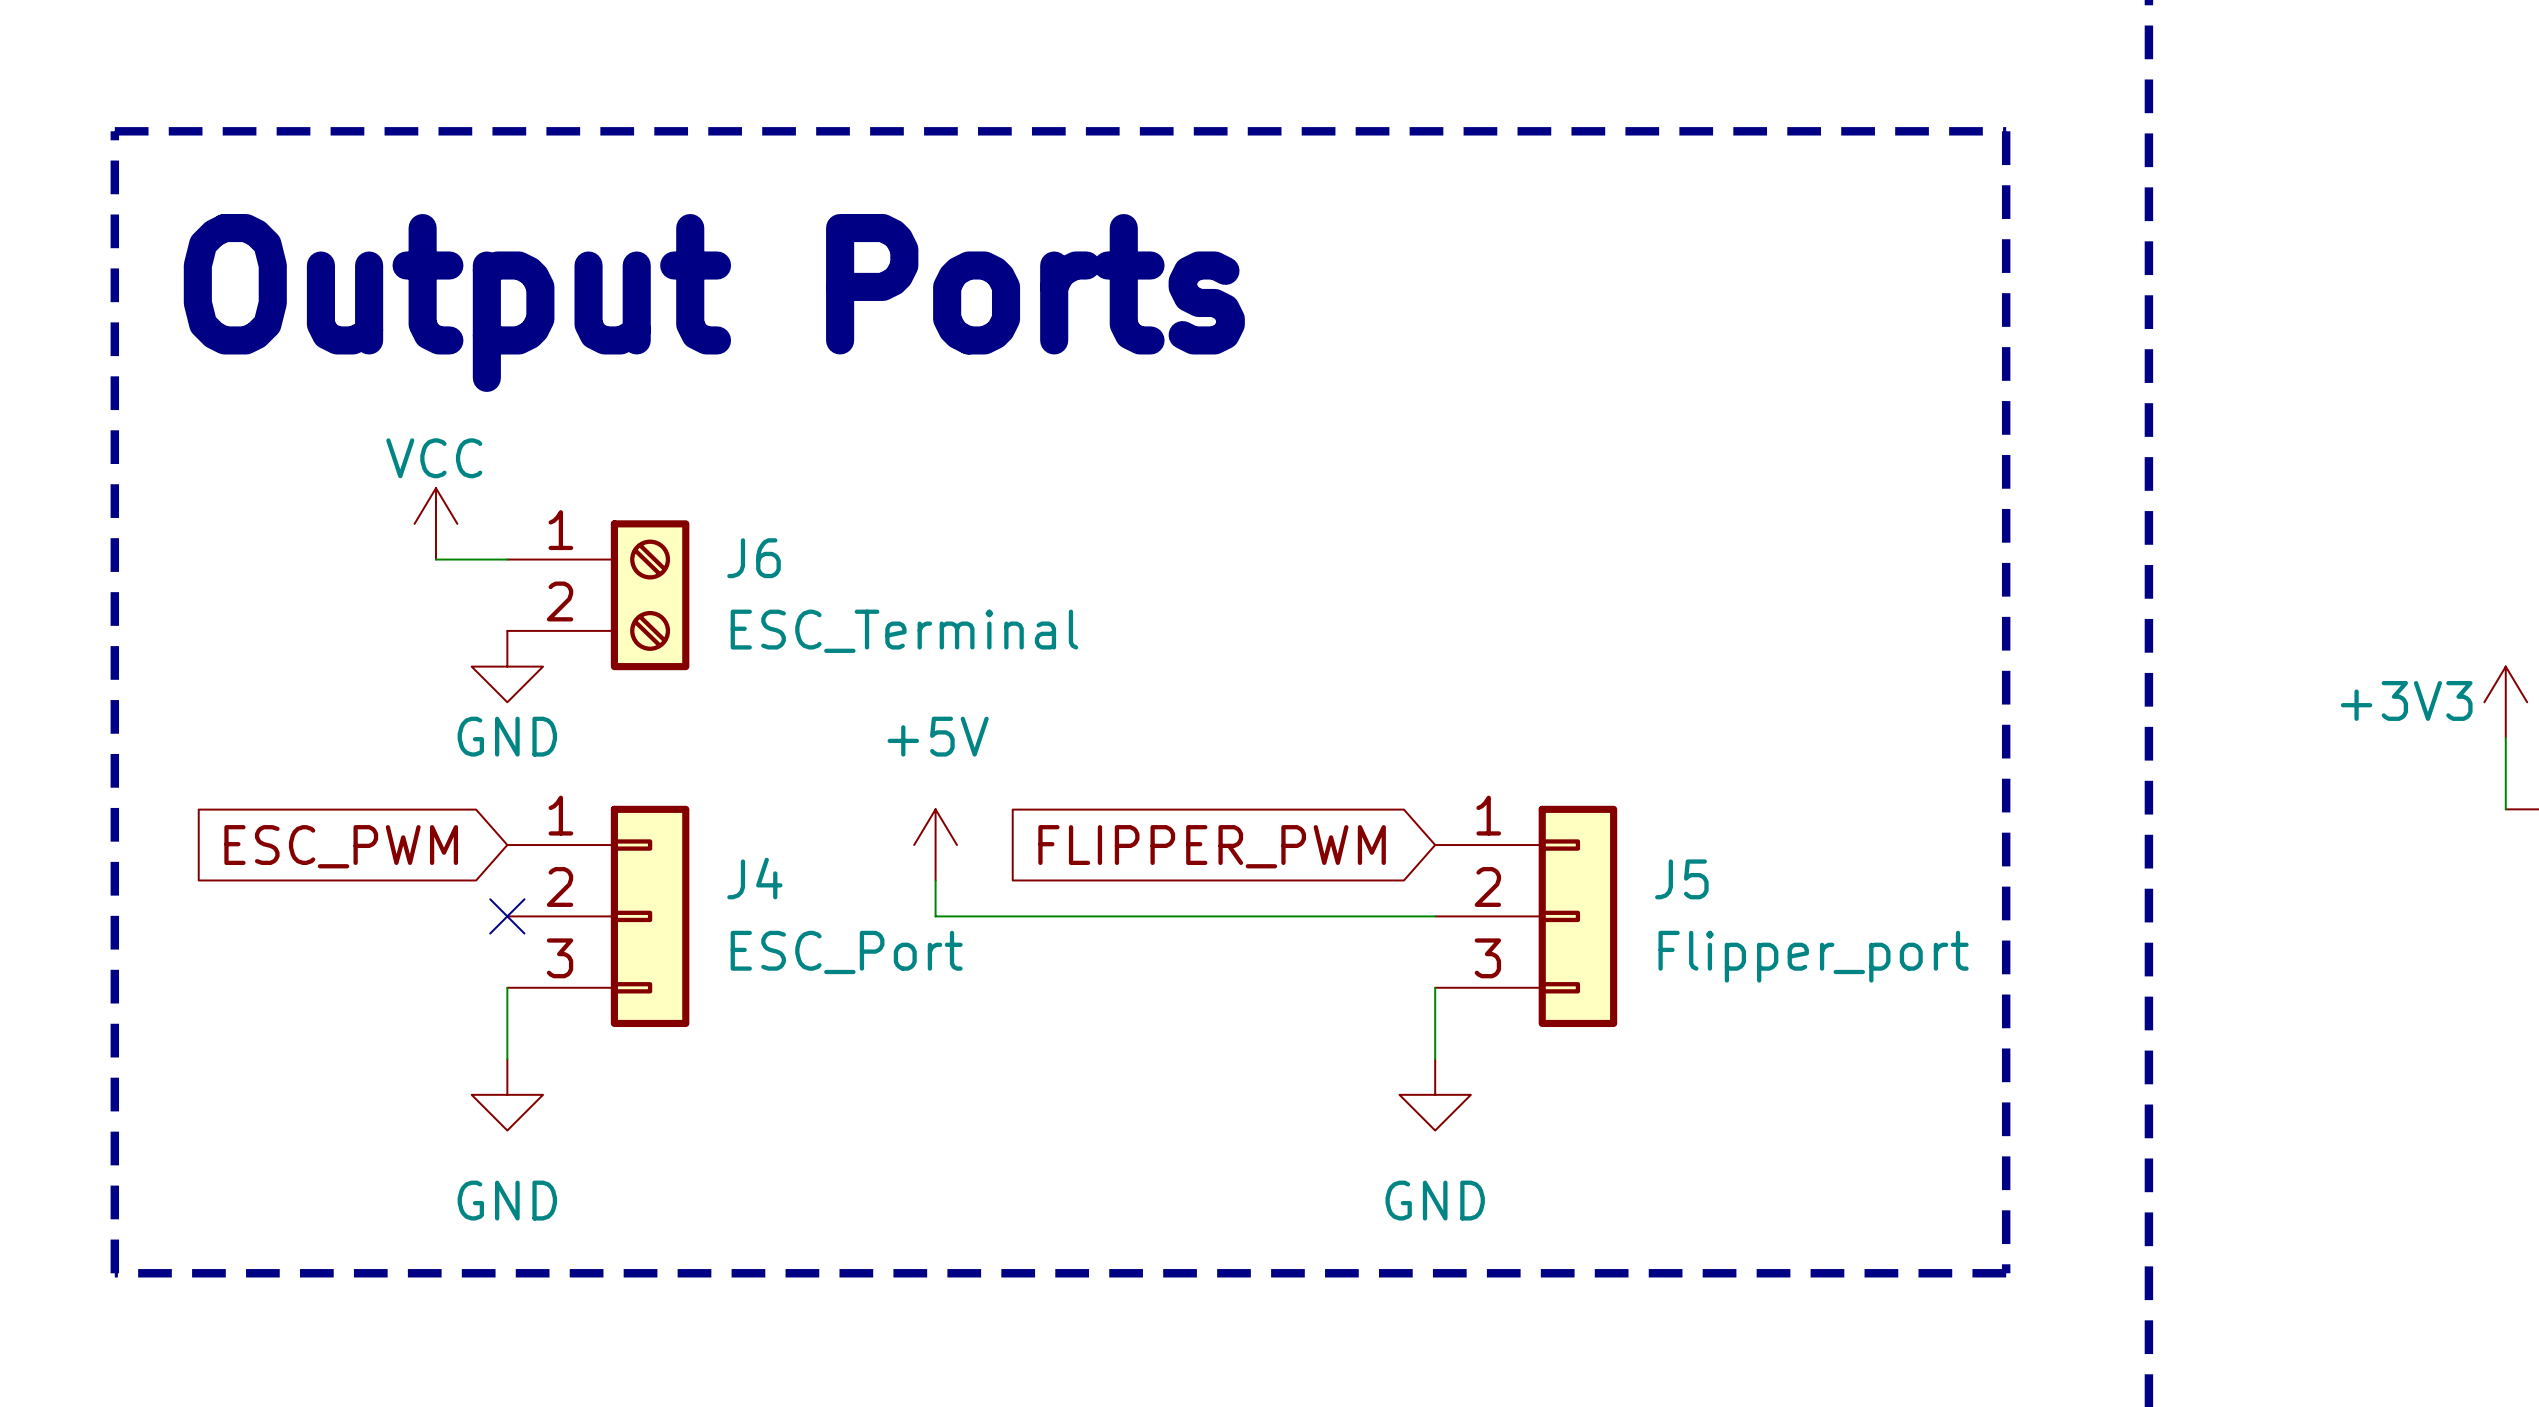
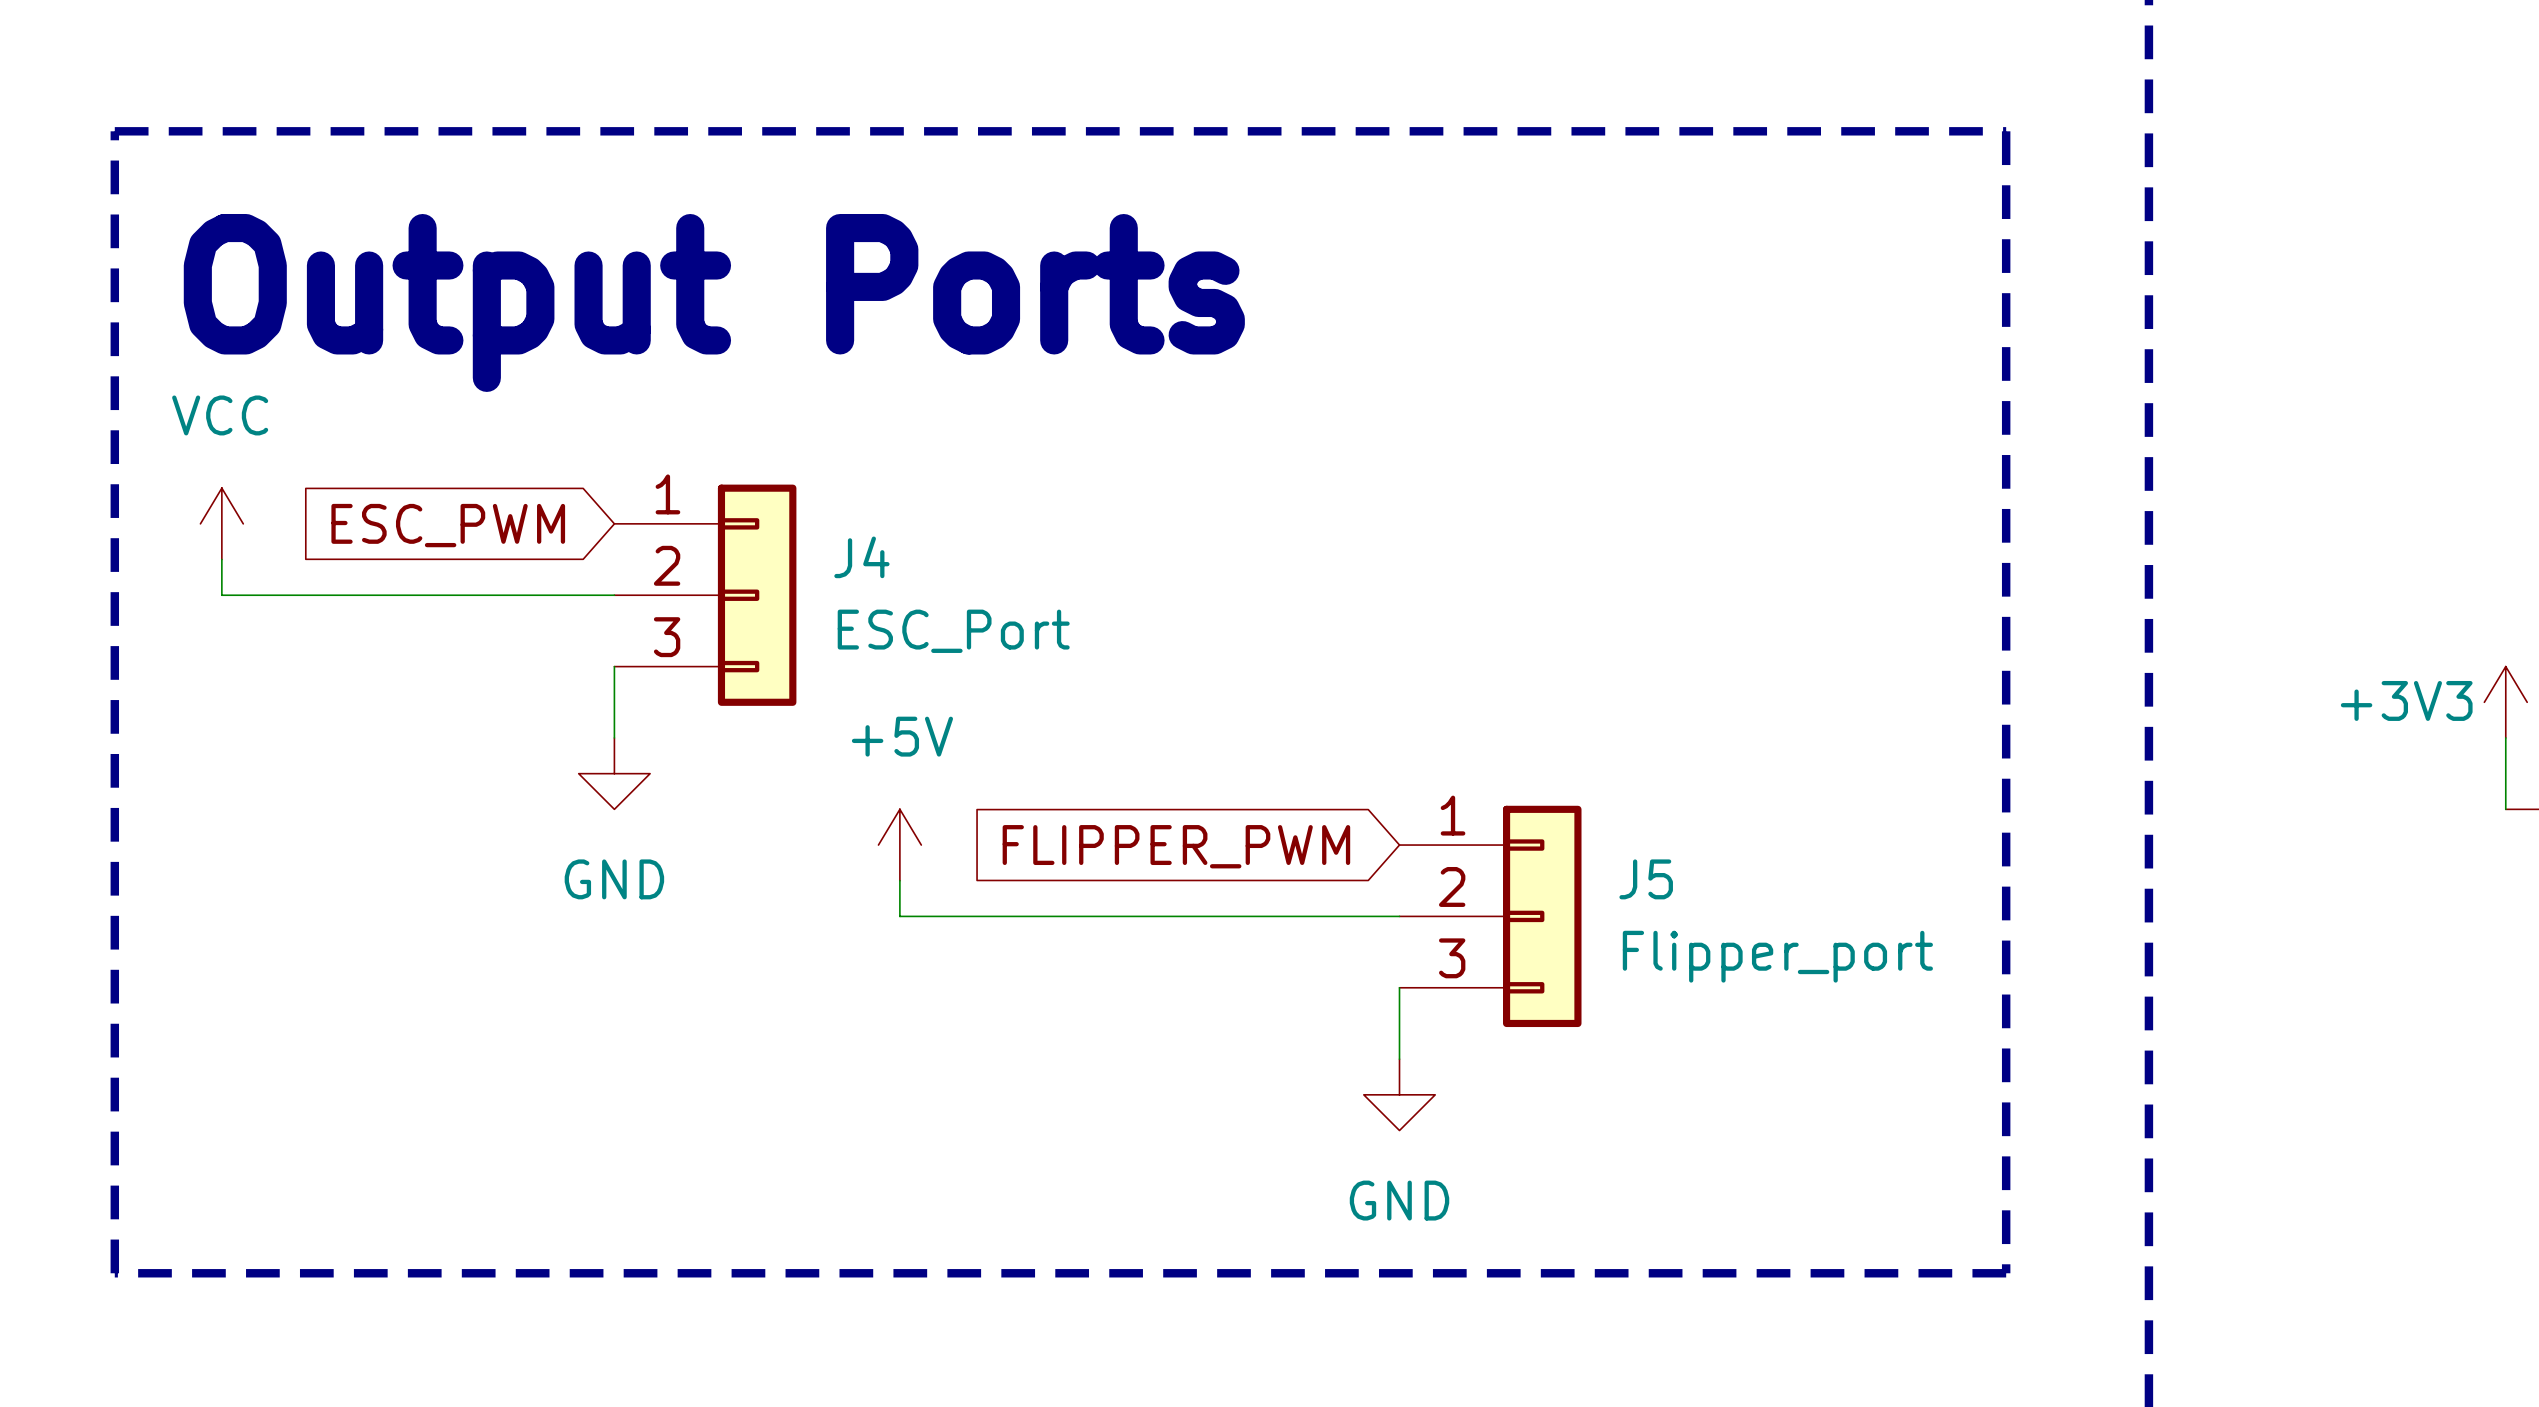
power symbol text position: VCC (434, 458) -> VCC (220, 415)
power symbol position: VCC (435, 523) -> VCC (221, 523)
wire: none -> (221, 559) (221, 595) (614, 595)
J6: ESC_Terminal (598, 595) -> none
power symbol position: GND (507, 666) -> GND (614, 773)
power symbol text position: GND (507, 736) -> GND (614, 879)
power symbol position: +5V (935, 845) -> +5V (899, 845)
global label position: ESC_PWM (341, 846) -> ESC_PWM (448, 525)
global label position: FLIPPER_PWM (1212, 846) -> FLIPPER_PWM (1176, 846)
wire: (935, 880) (935, 916) -> (899, 880) (899, 916) (935, 916)
no-connect mark: (507, 916) -> none
J4 position: (598, 916) -> (705, 595)
J5 position: (1526, 916) -> (1490, 916)
wire: (507, 987) (507, 1059) -> (614, 666) (614, 737)
wire: (1435, 987) (1435, 1059) -> (1399, 987) (1399, 1059)
power symbol: GND (507, 1094) -> none
power symbol position: GND (1435, 1094) -> GND (1399, 1094)

